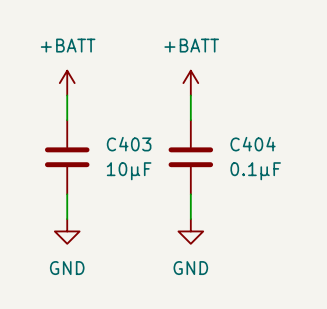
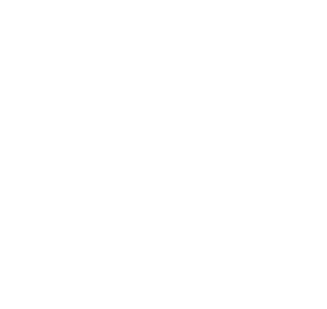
power symbol: +BATT (67, 83) -> none
power symbol: +BATT (190, 83) -> none
wire: (67, 95) (67, 120) -> none
wire: (190, 95) (190, 120) -> none
C403: 10µF (67, 157) -> none
C404: 0.1µF (190, 157) -> none
wire: (67, 194) (67, 219) -> none
wire: (190, 194) (190, 219) -> none
power symbol: GND (67, 231) -> none
power symbol: GND (190, 231) -> none

